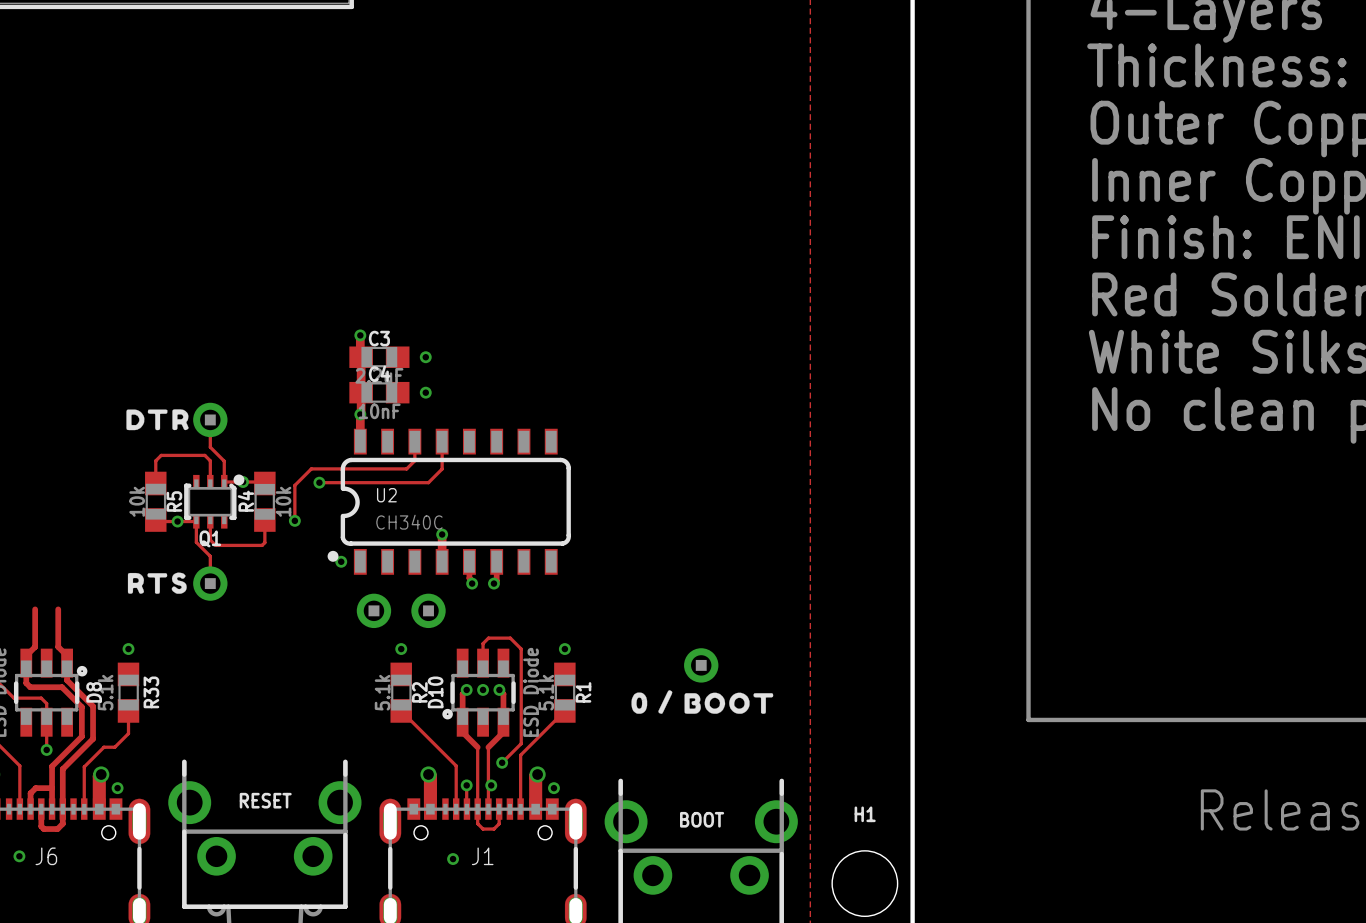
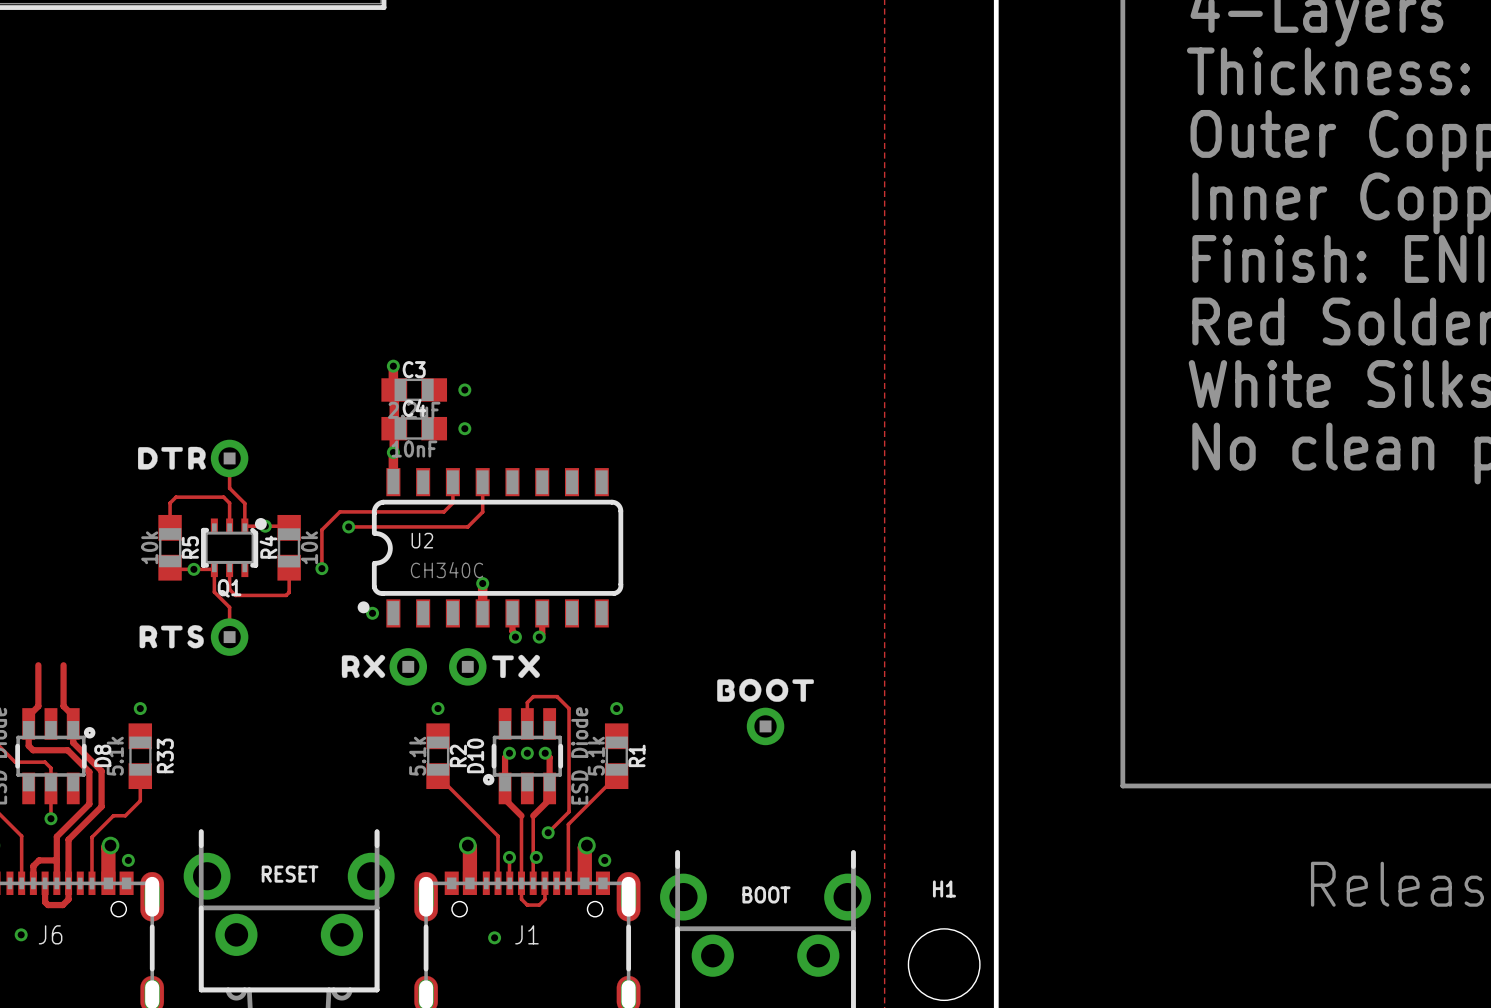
drawing: none -> [341, 654, 386, 679]
drawing: none -> [492, 654, 541, 679]
drawing: none -> [717, 678, 814, 702]
drawing: [631, 690, 774, 714] -> none

